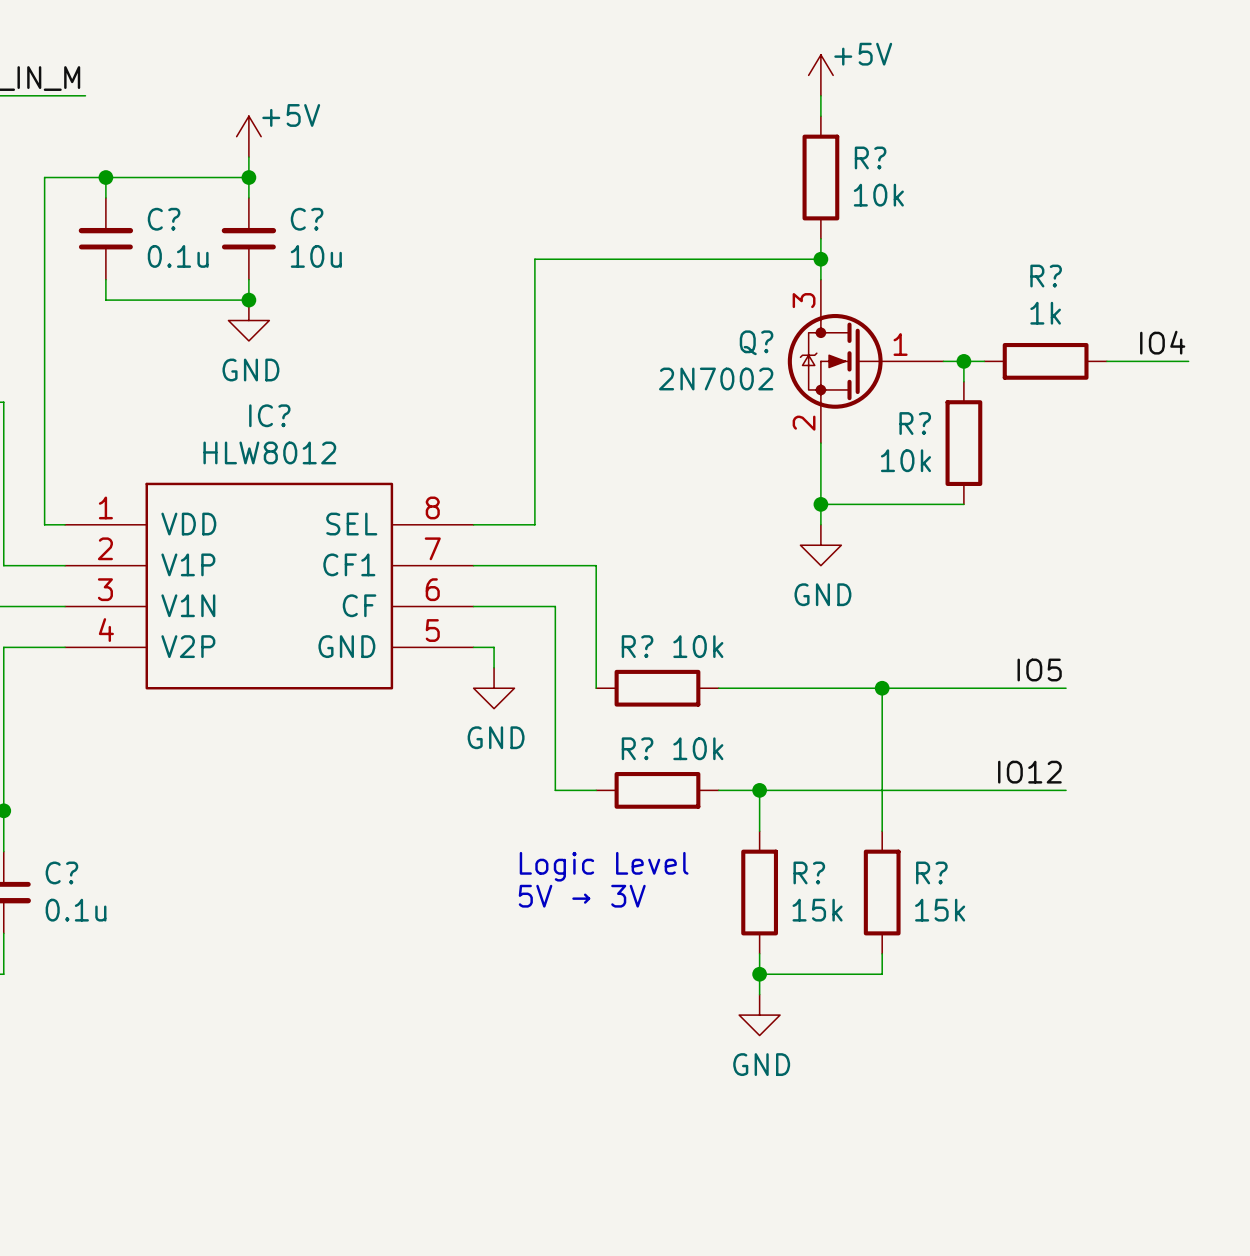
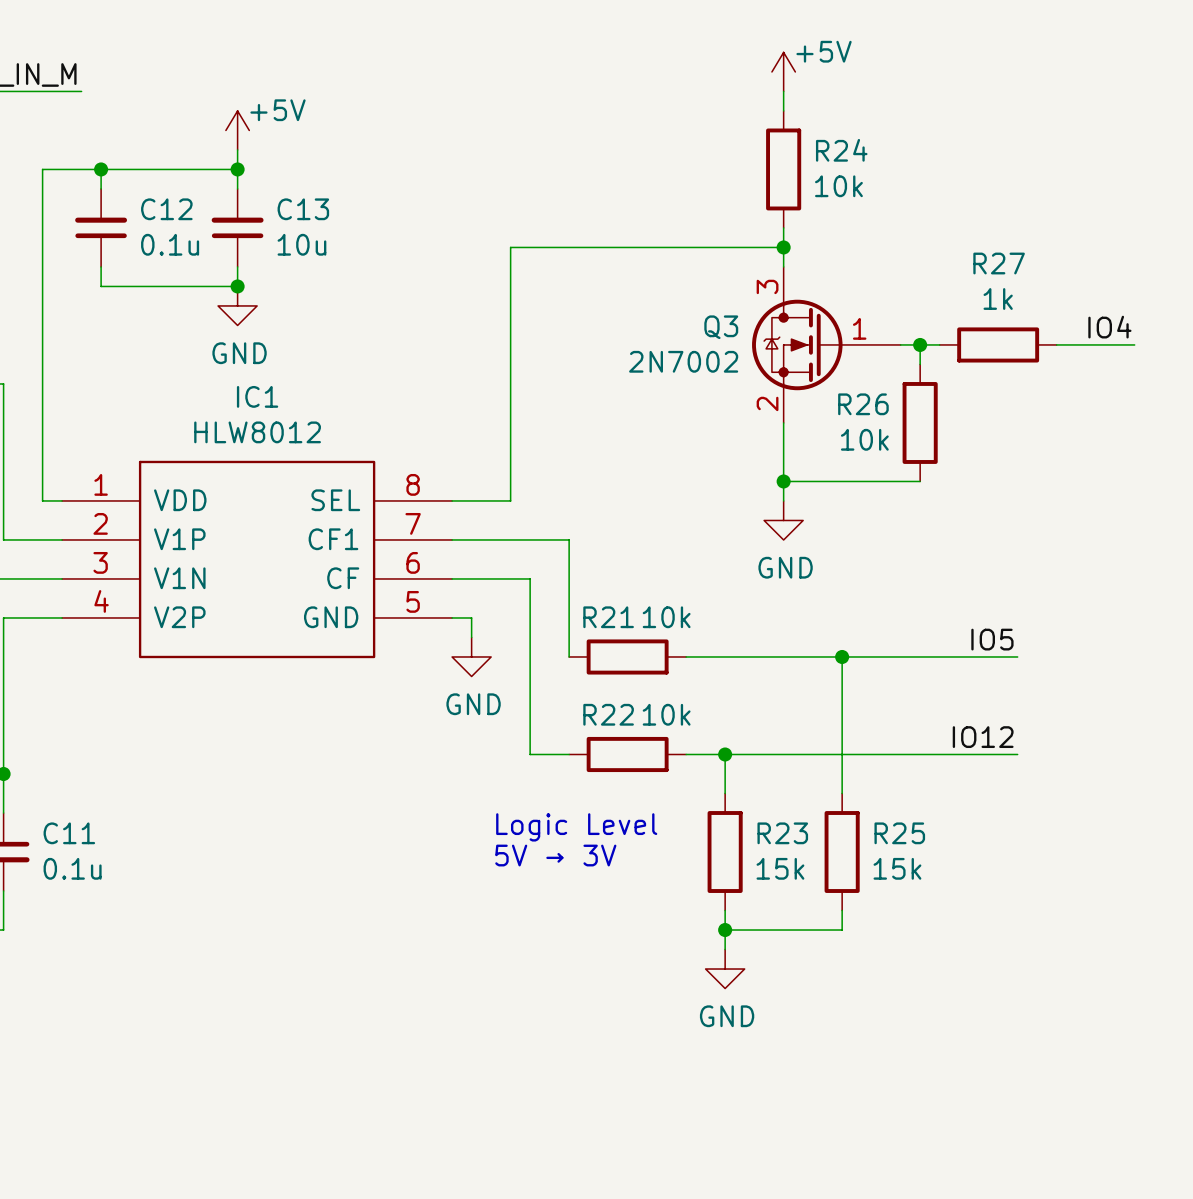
R? name: R? (870, 157) -> R24 (841, 150)
C? name: C? (164, 219) -> C12 (166, 209)
C? name: C? (307, 219) -> C13 (303, 209)
R? name: R? (1046, 276) -> R27 (999, 263)
Q? name: Q? (756, 342) -> Q3 (721, 327)
IC? name: IC? (269, 415) -> IC1 (257, 396)
R? name: R? (915, 423) -> R26 (863, 404)
R? name: R? (637, 646) -> R21 (608, 617)
R? name: R? (637, 748) -> R22 (608, 714)
C? name: C? (61, 872) -> C11 (69, 833)
R? name: R? (809, 872) -> R23 (782, 833)
R? name: R? (931, 872) -> R25 (899, 833)

